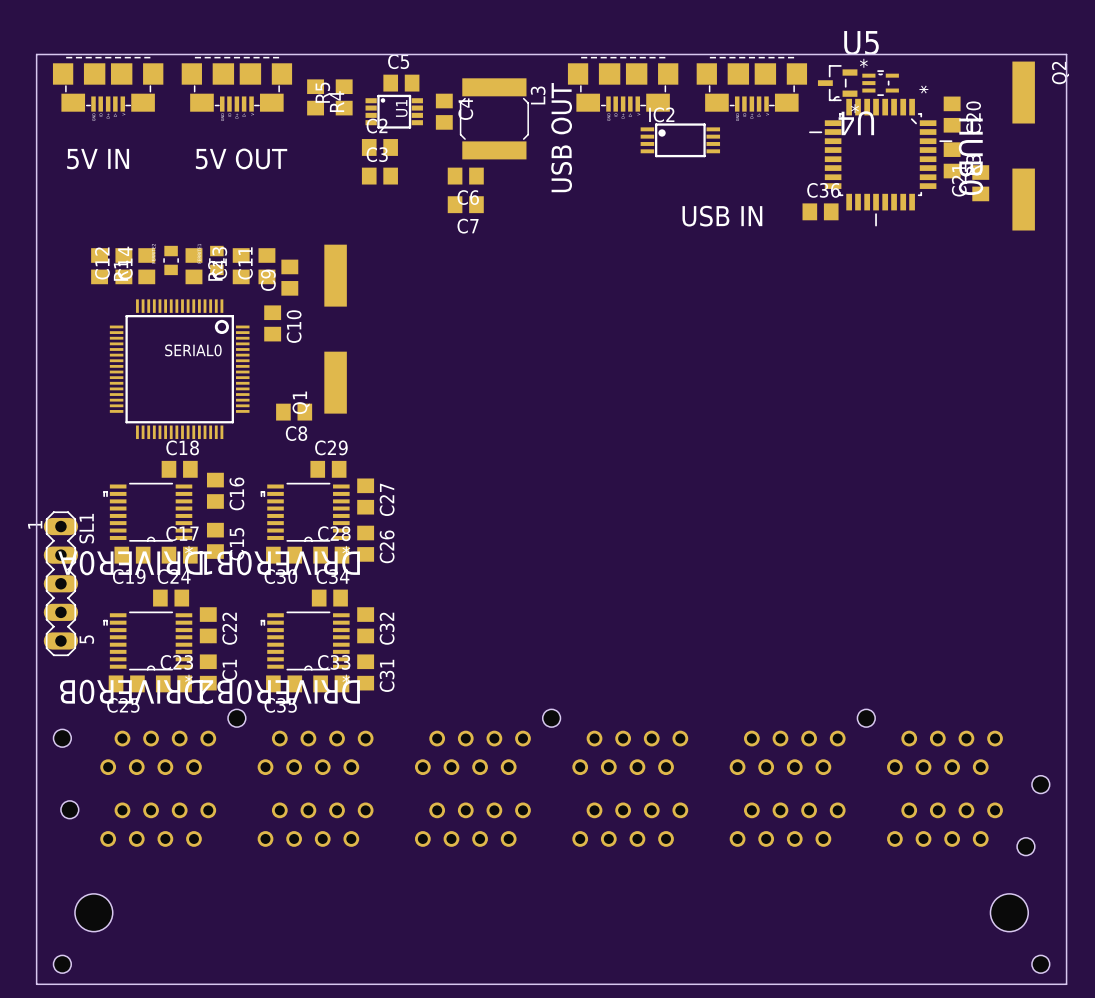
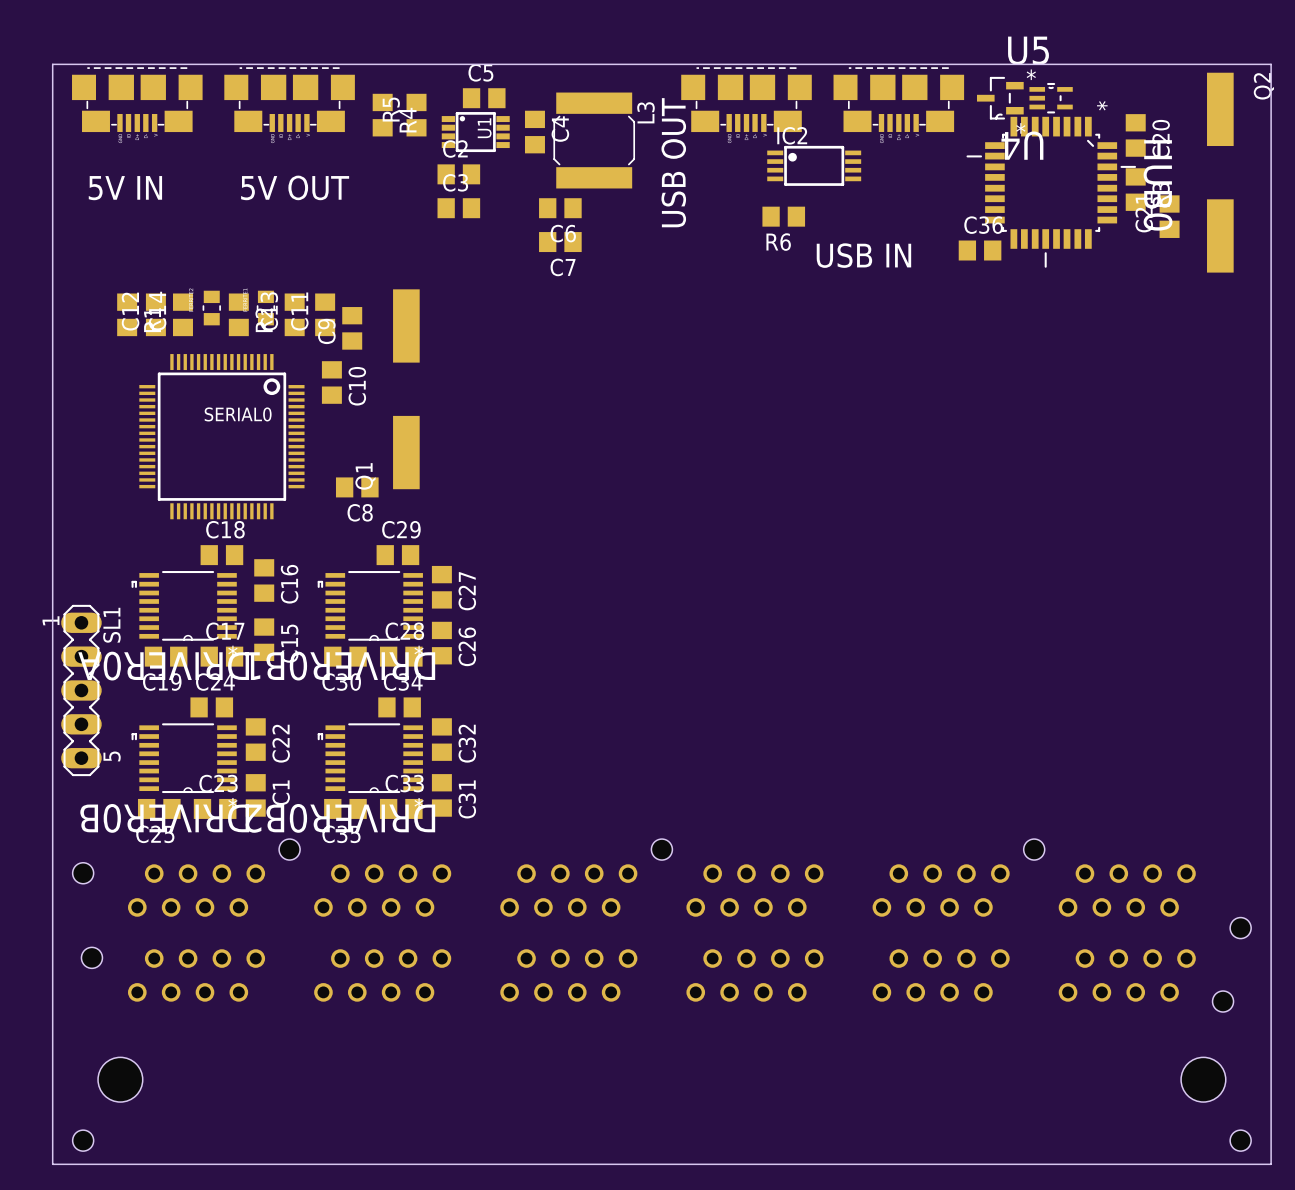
R6: none -> (783, 216)

